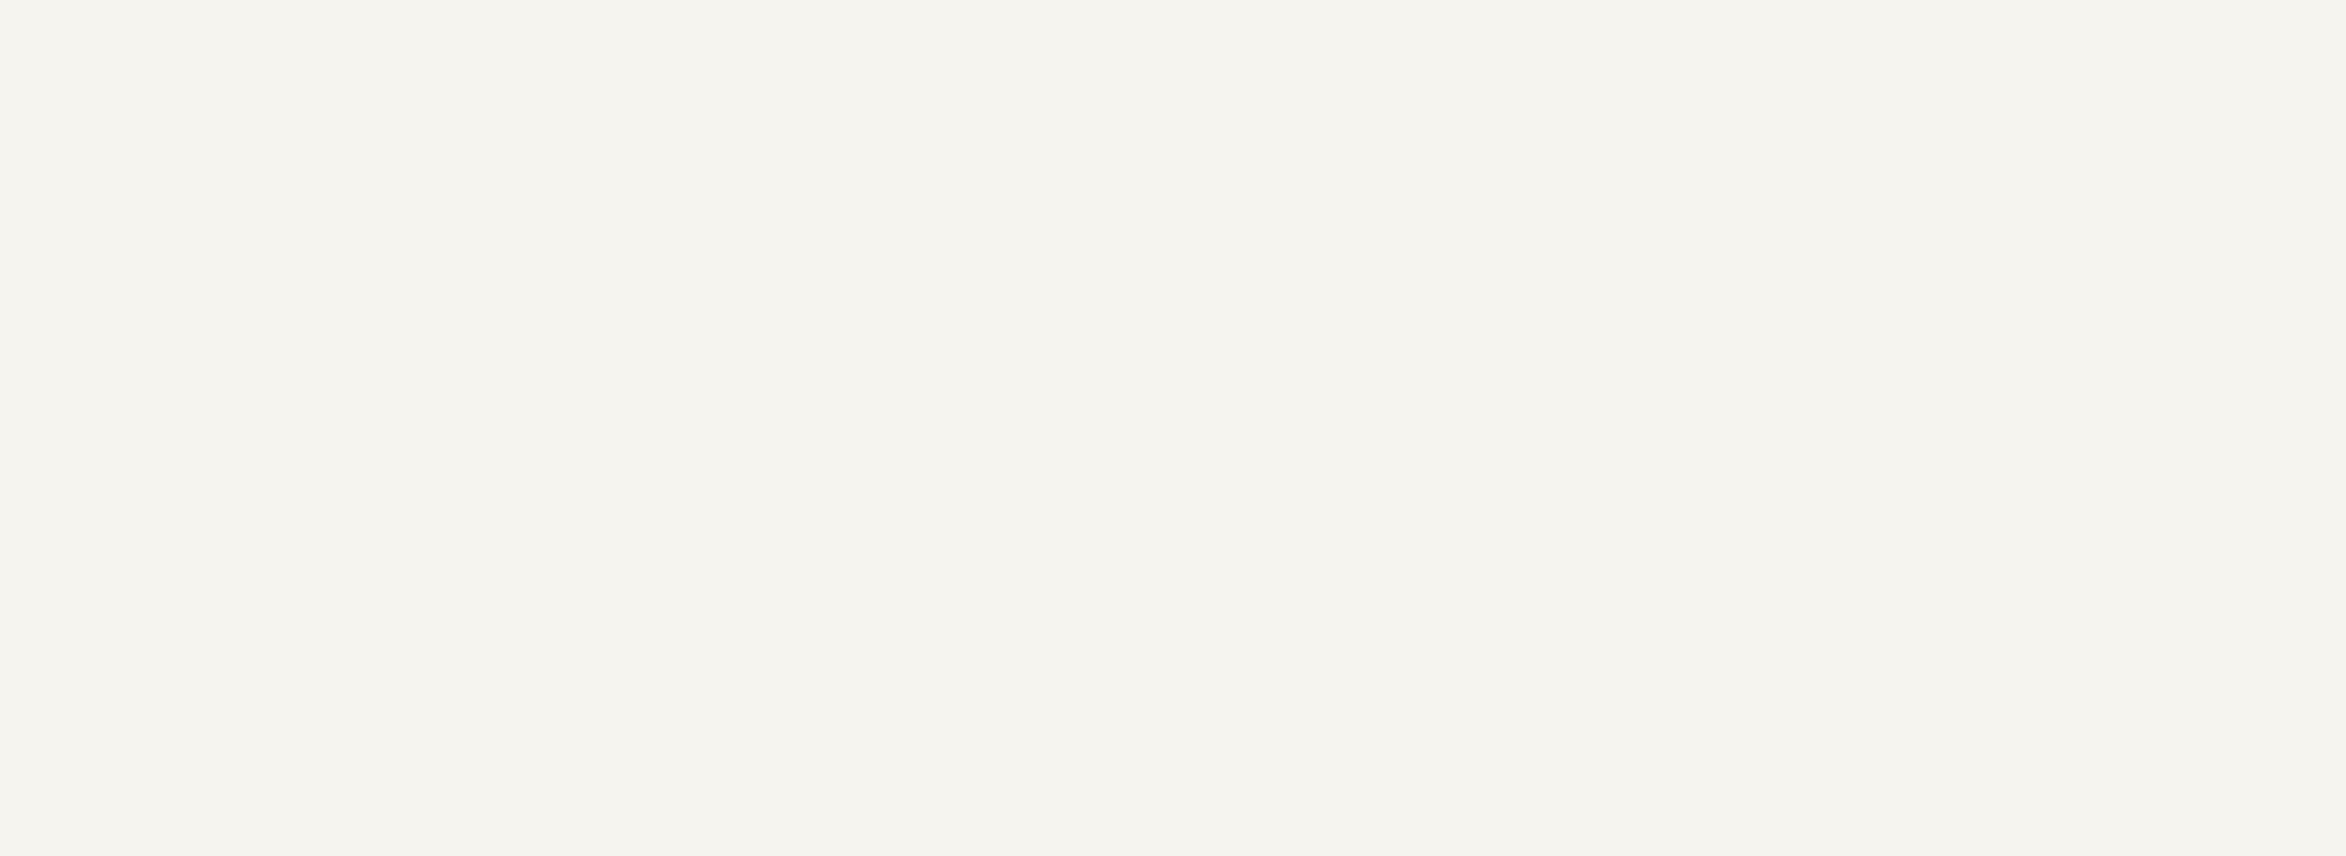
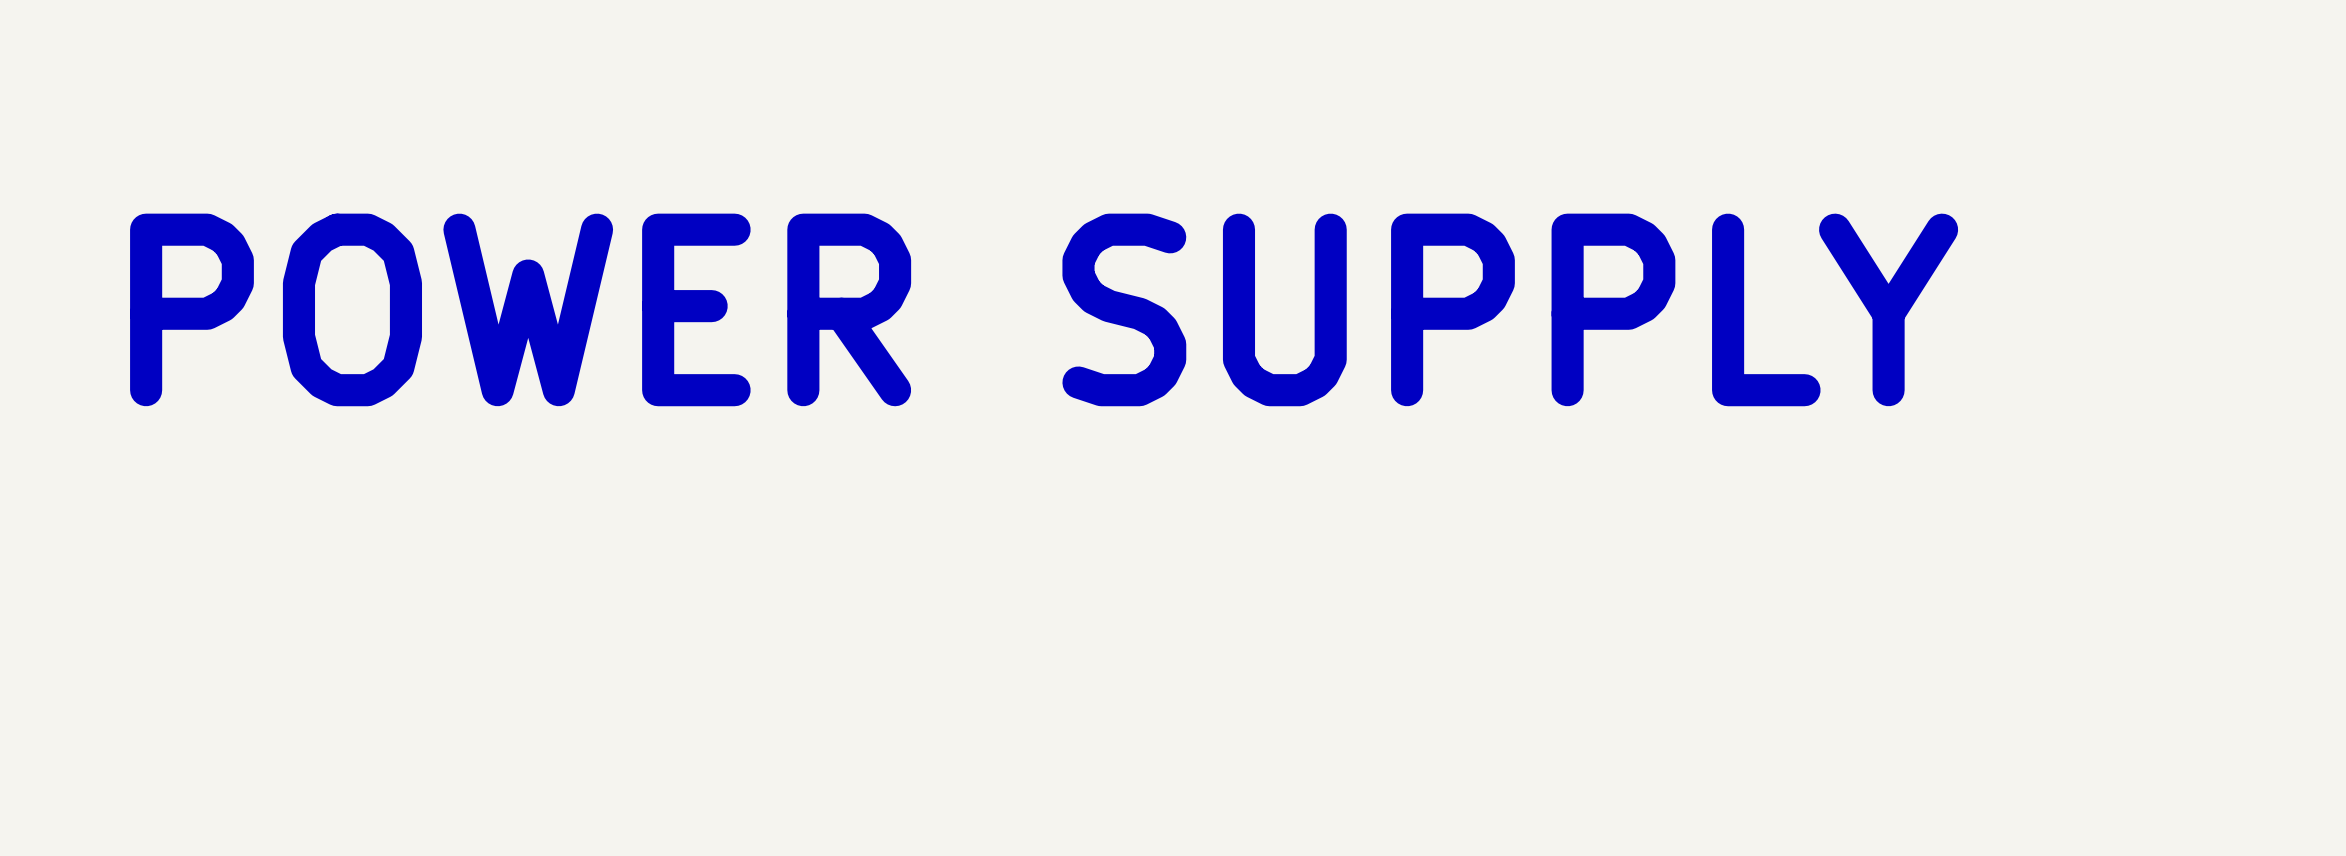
text: none -> POWER SUPPLY (1044, 309)

